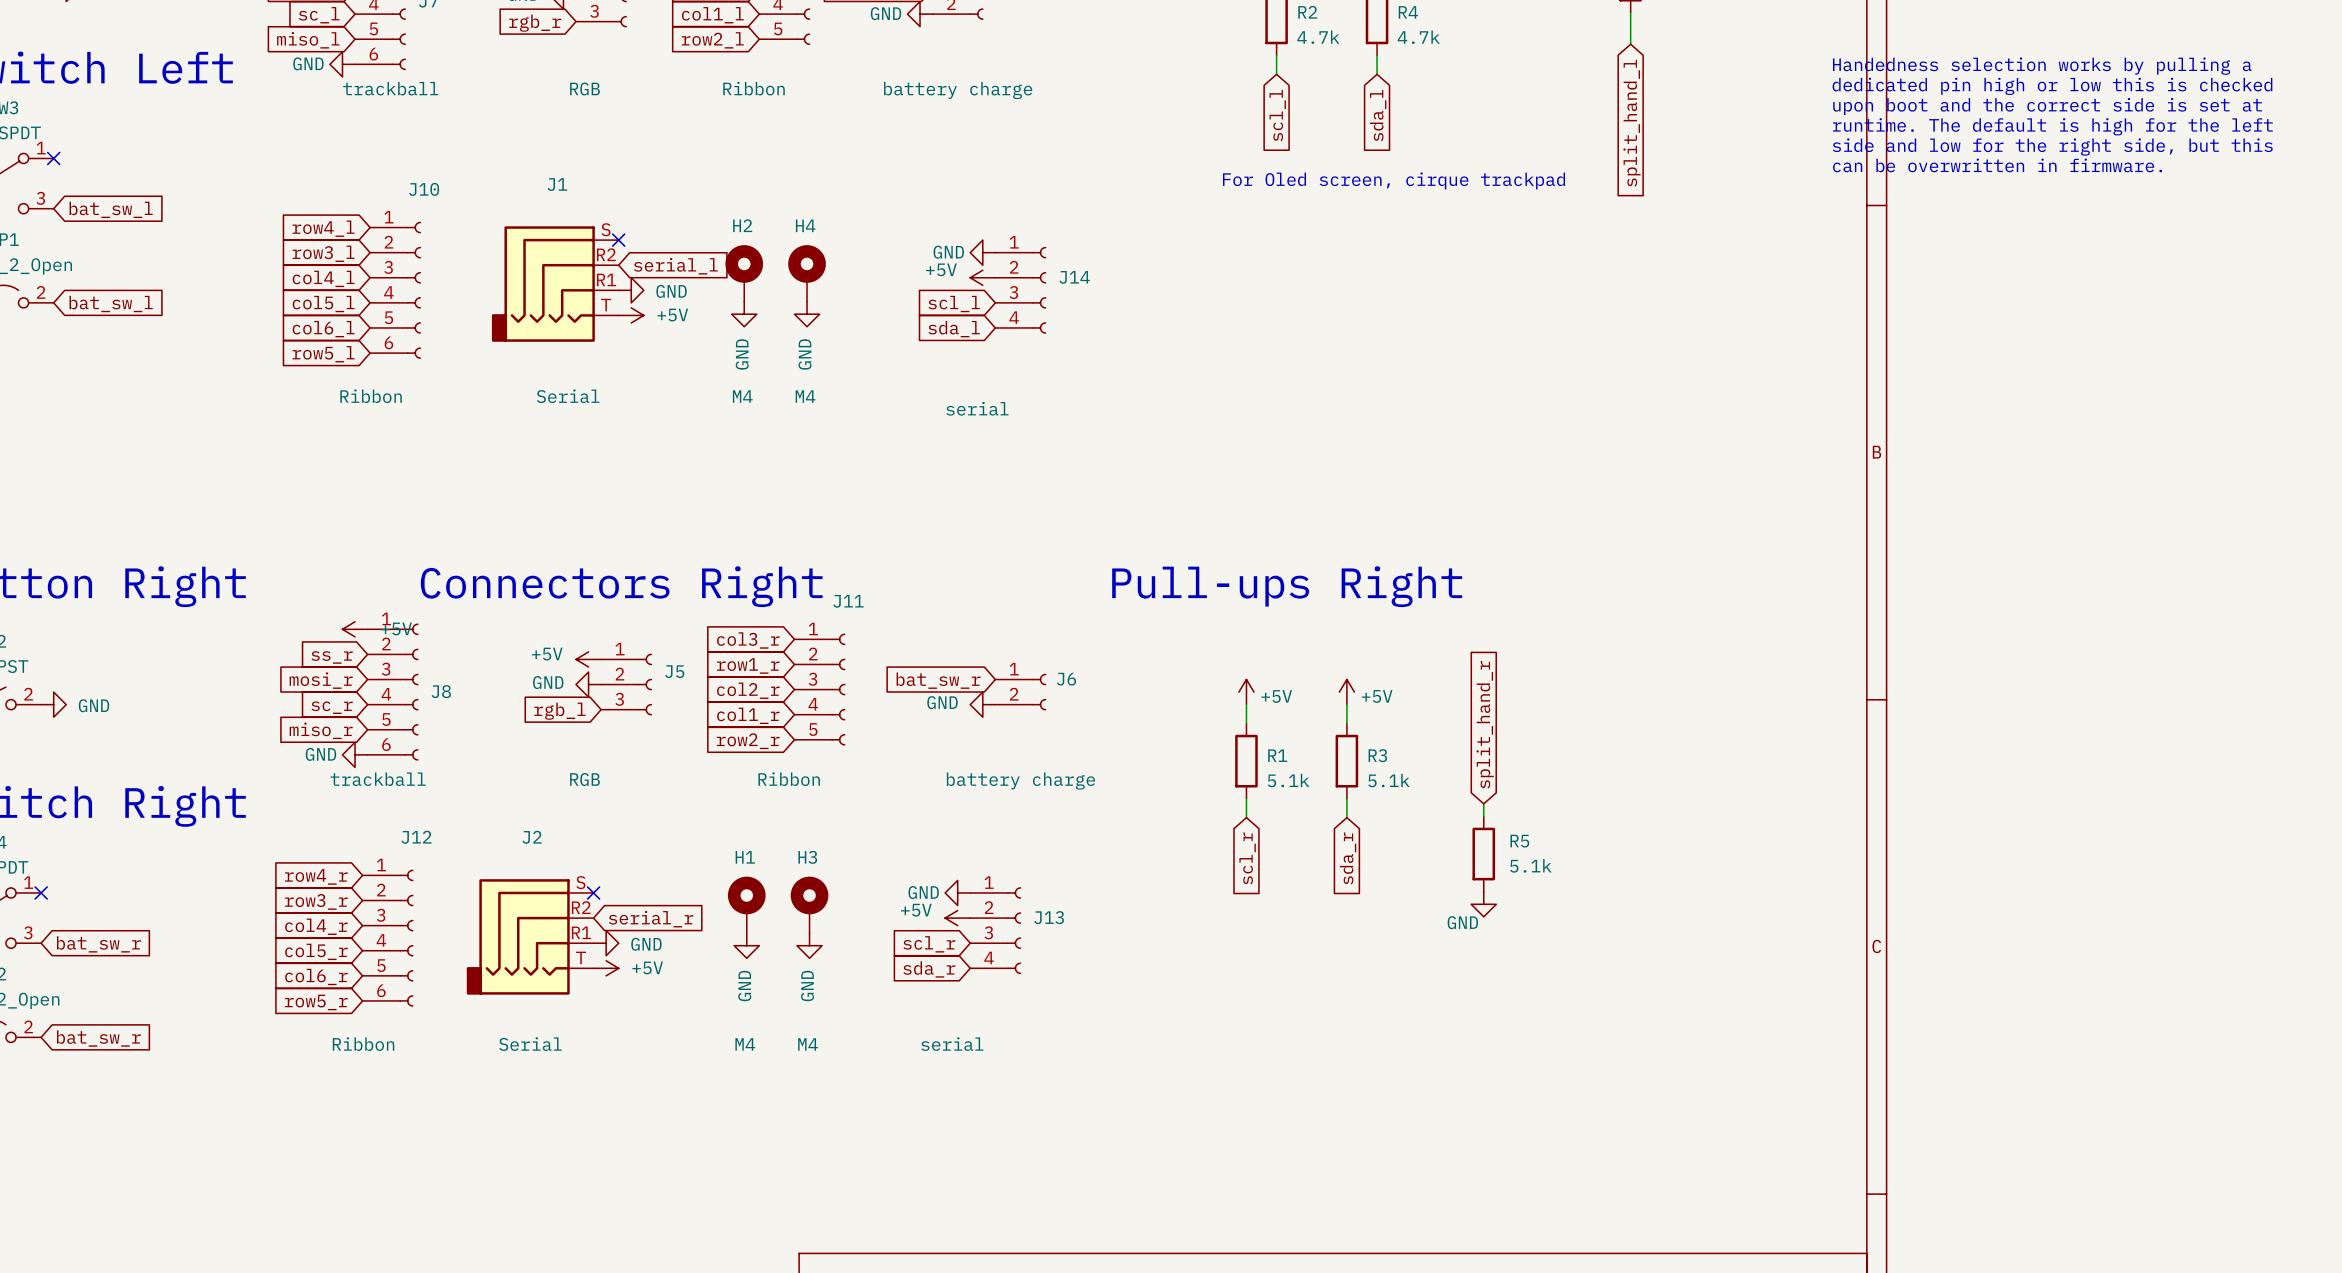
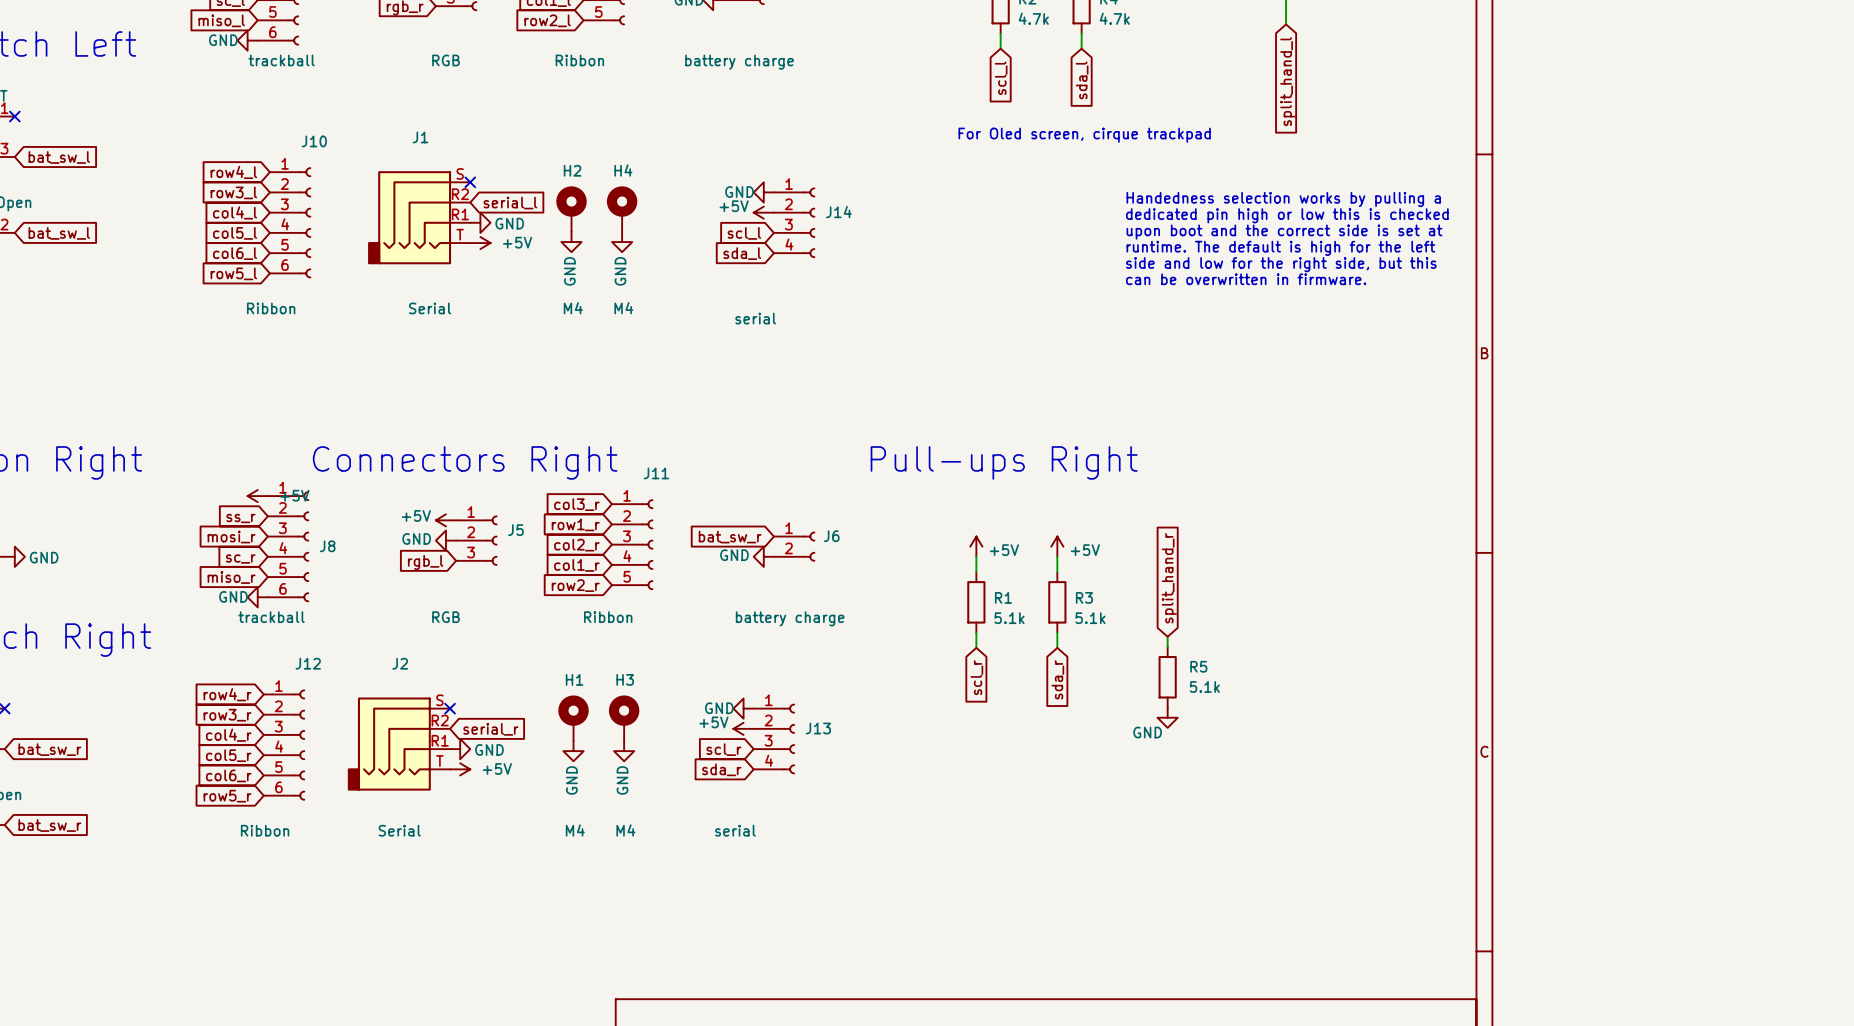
text: Handedness selection works by pulling a (2042, 66) -> none
text: dedicated pin high or low this is checked (2052, 86) -> none
text: upon boot and the correct side is set at (2047, 106) -> none
text: runtime. The default is high for the left (2052, 126) -> none
text: side and low for the right side, but this (2052, 147) -> none
text: can be overwritten in firmware. (1997, 165) -> none
text: none -> Handedness selection works by pulling a (1283, 199)
text: none -> dedicated pin high or low this is checked (1287, 215)
text: none -> upon boot and the correct side is set at (1284, 232)
text: none -> runtime. The default is high for the left (1280, 248)
text: none -> side and low for the right side, but this (1281, 264)
text: none -> can be overwritten in firmware. (1246, 279)

